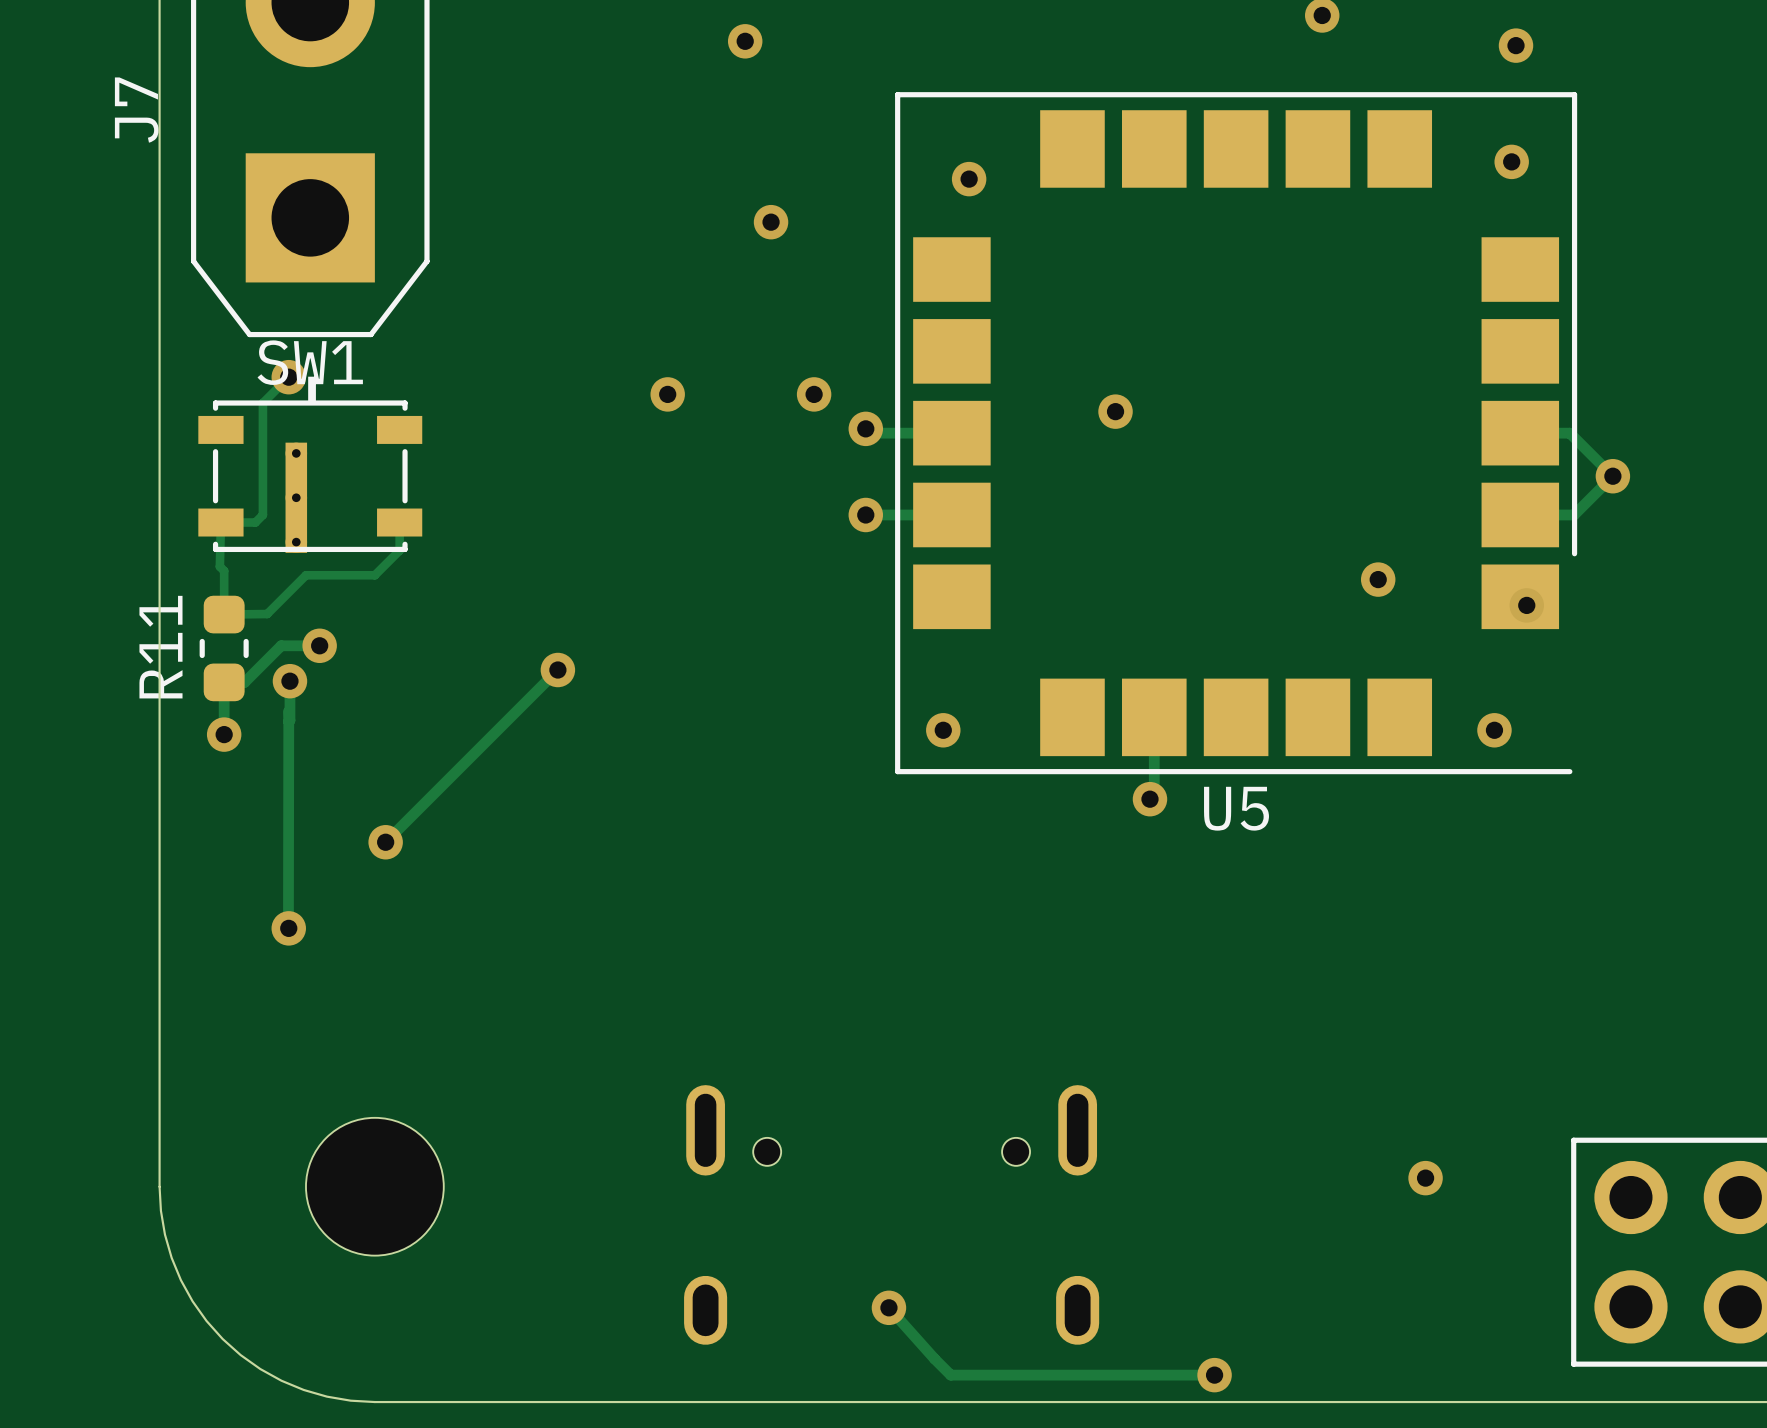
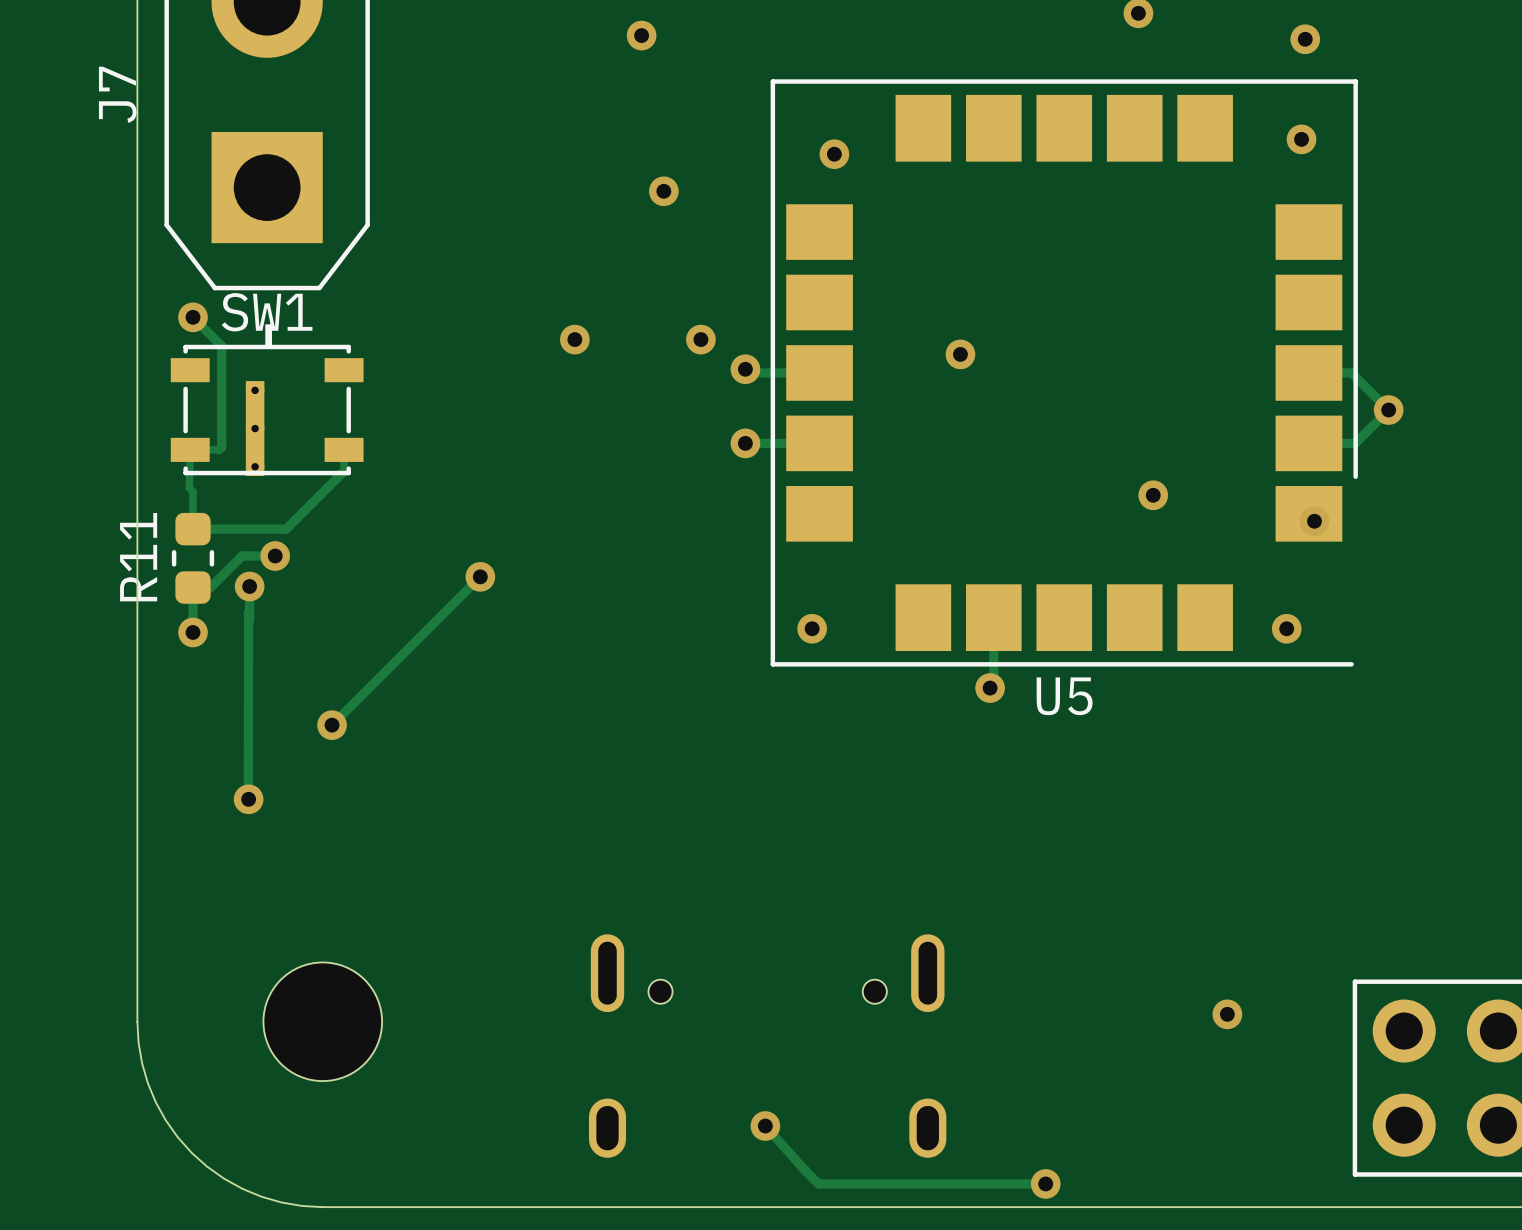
track: (288, 377) (262, 403) (262, 514) (254, 522) -> (193, 317) (221, 346) (221, 447) (218, 449)
via position: (288, 377) -> (193, 317)
track: (399, 547) (399, 550) (374, 575) (305, 575) (267, 614) (224, 614) -> (344, 471) (286, 529) (193, 529)
via position: (1378, 579) -> (1153, 495)

